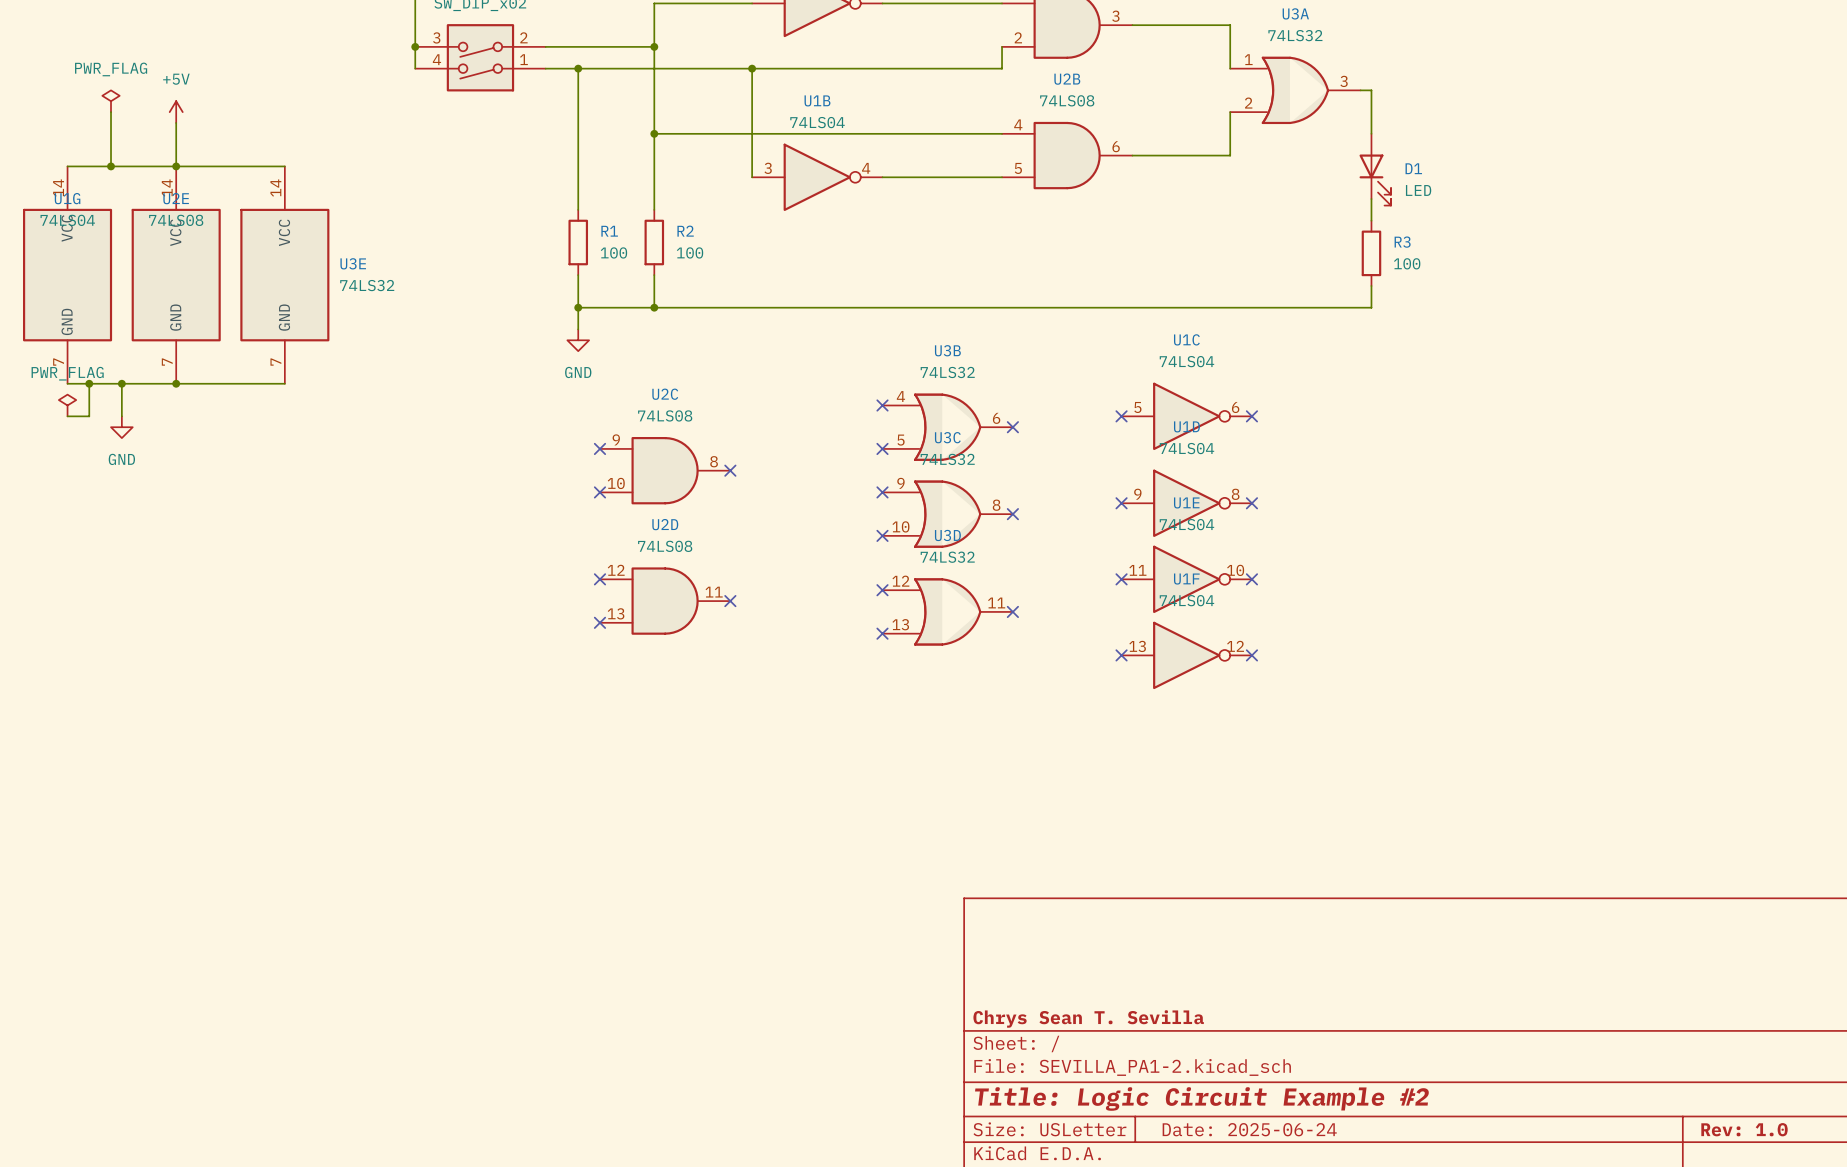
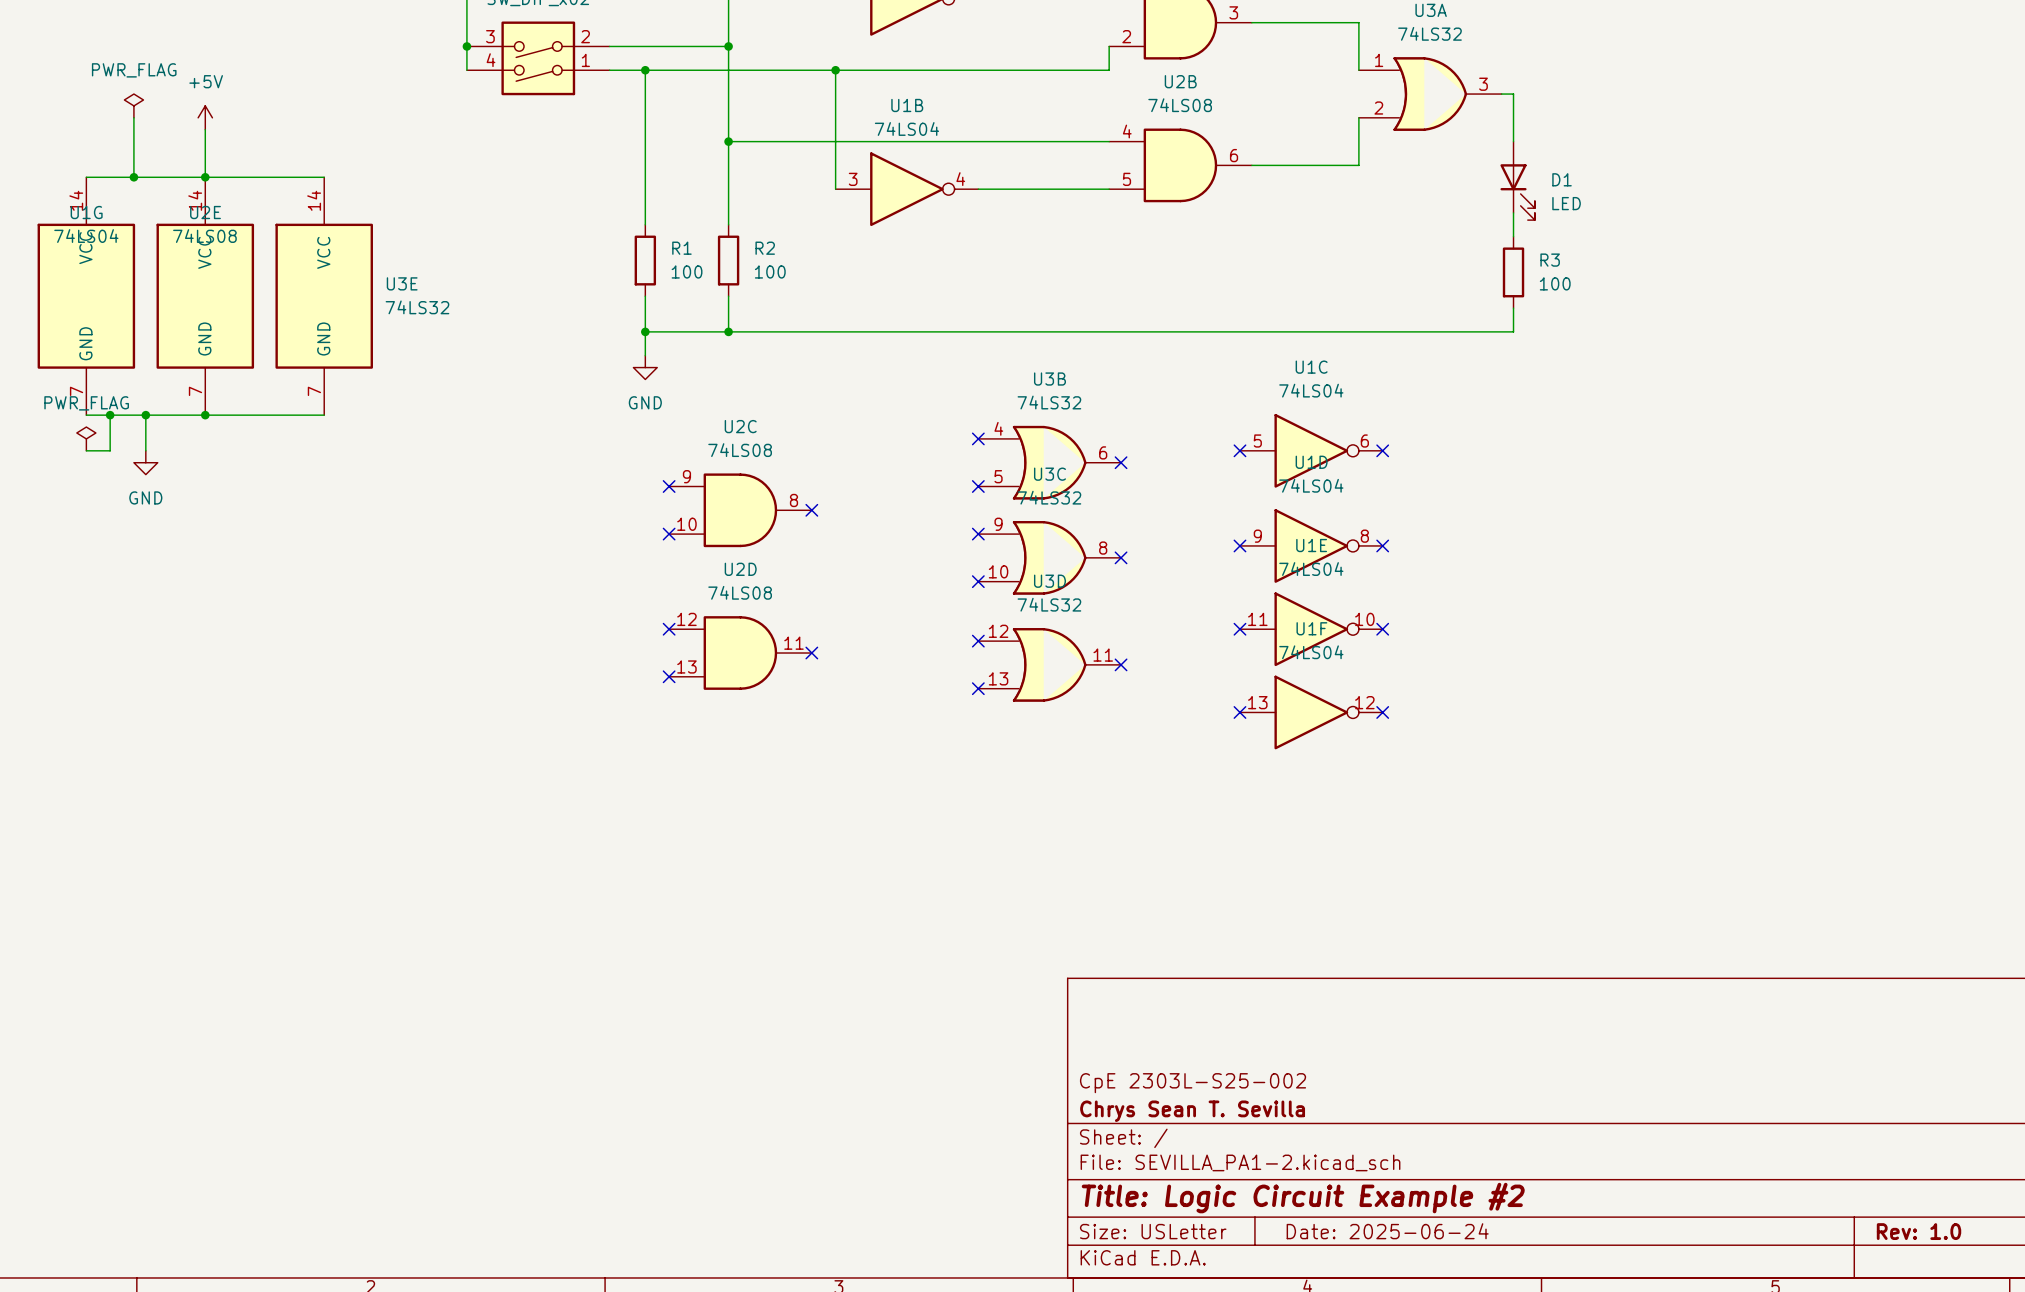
title block: none -> CpE 2303L-S25-002 (1193, 1083)

